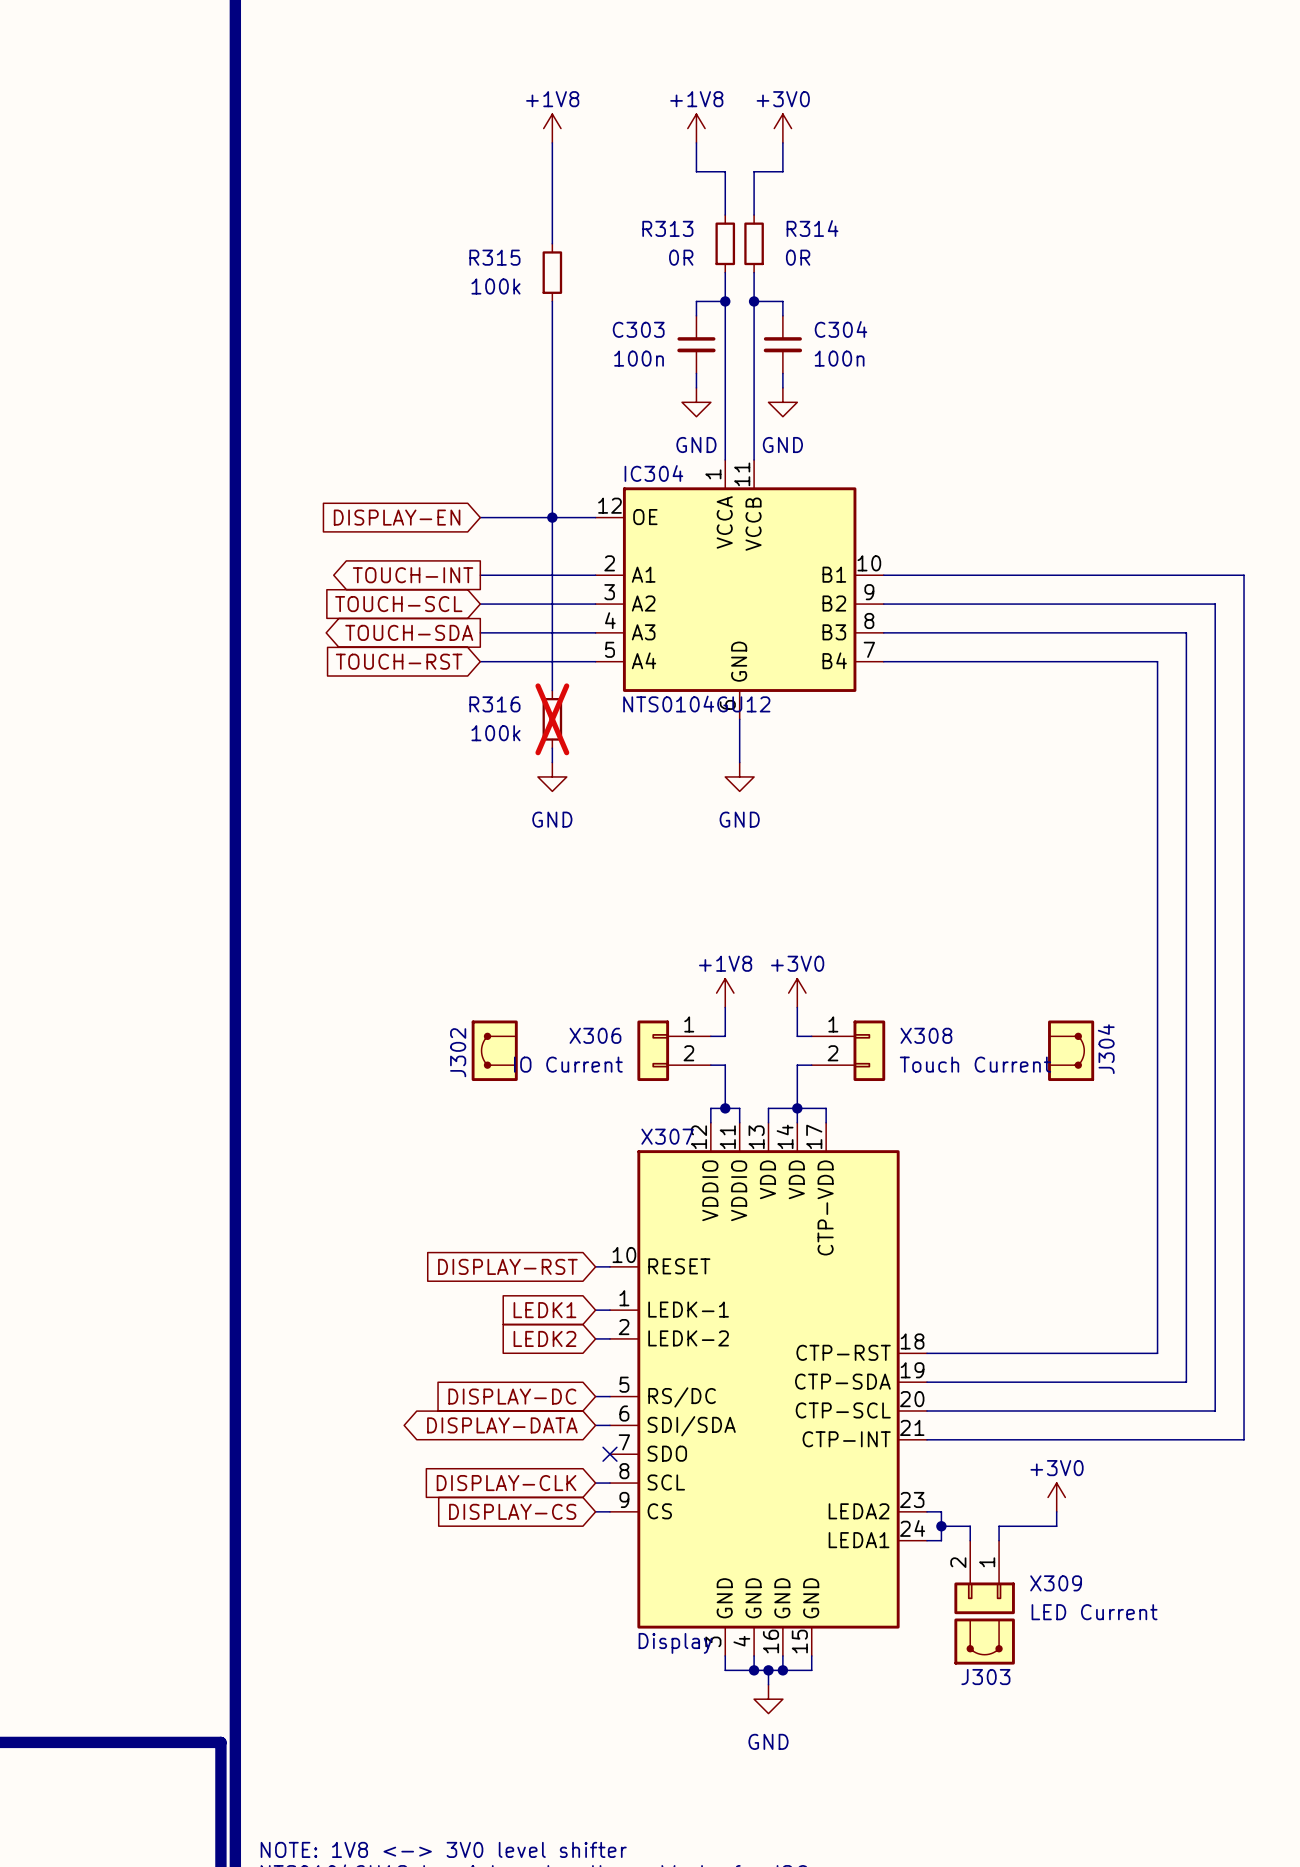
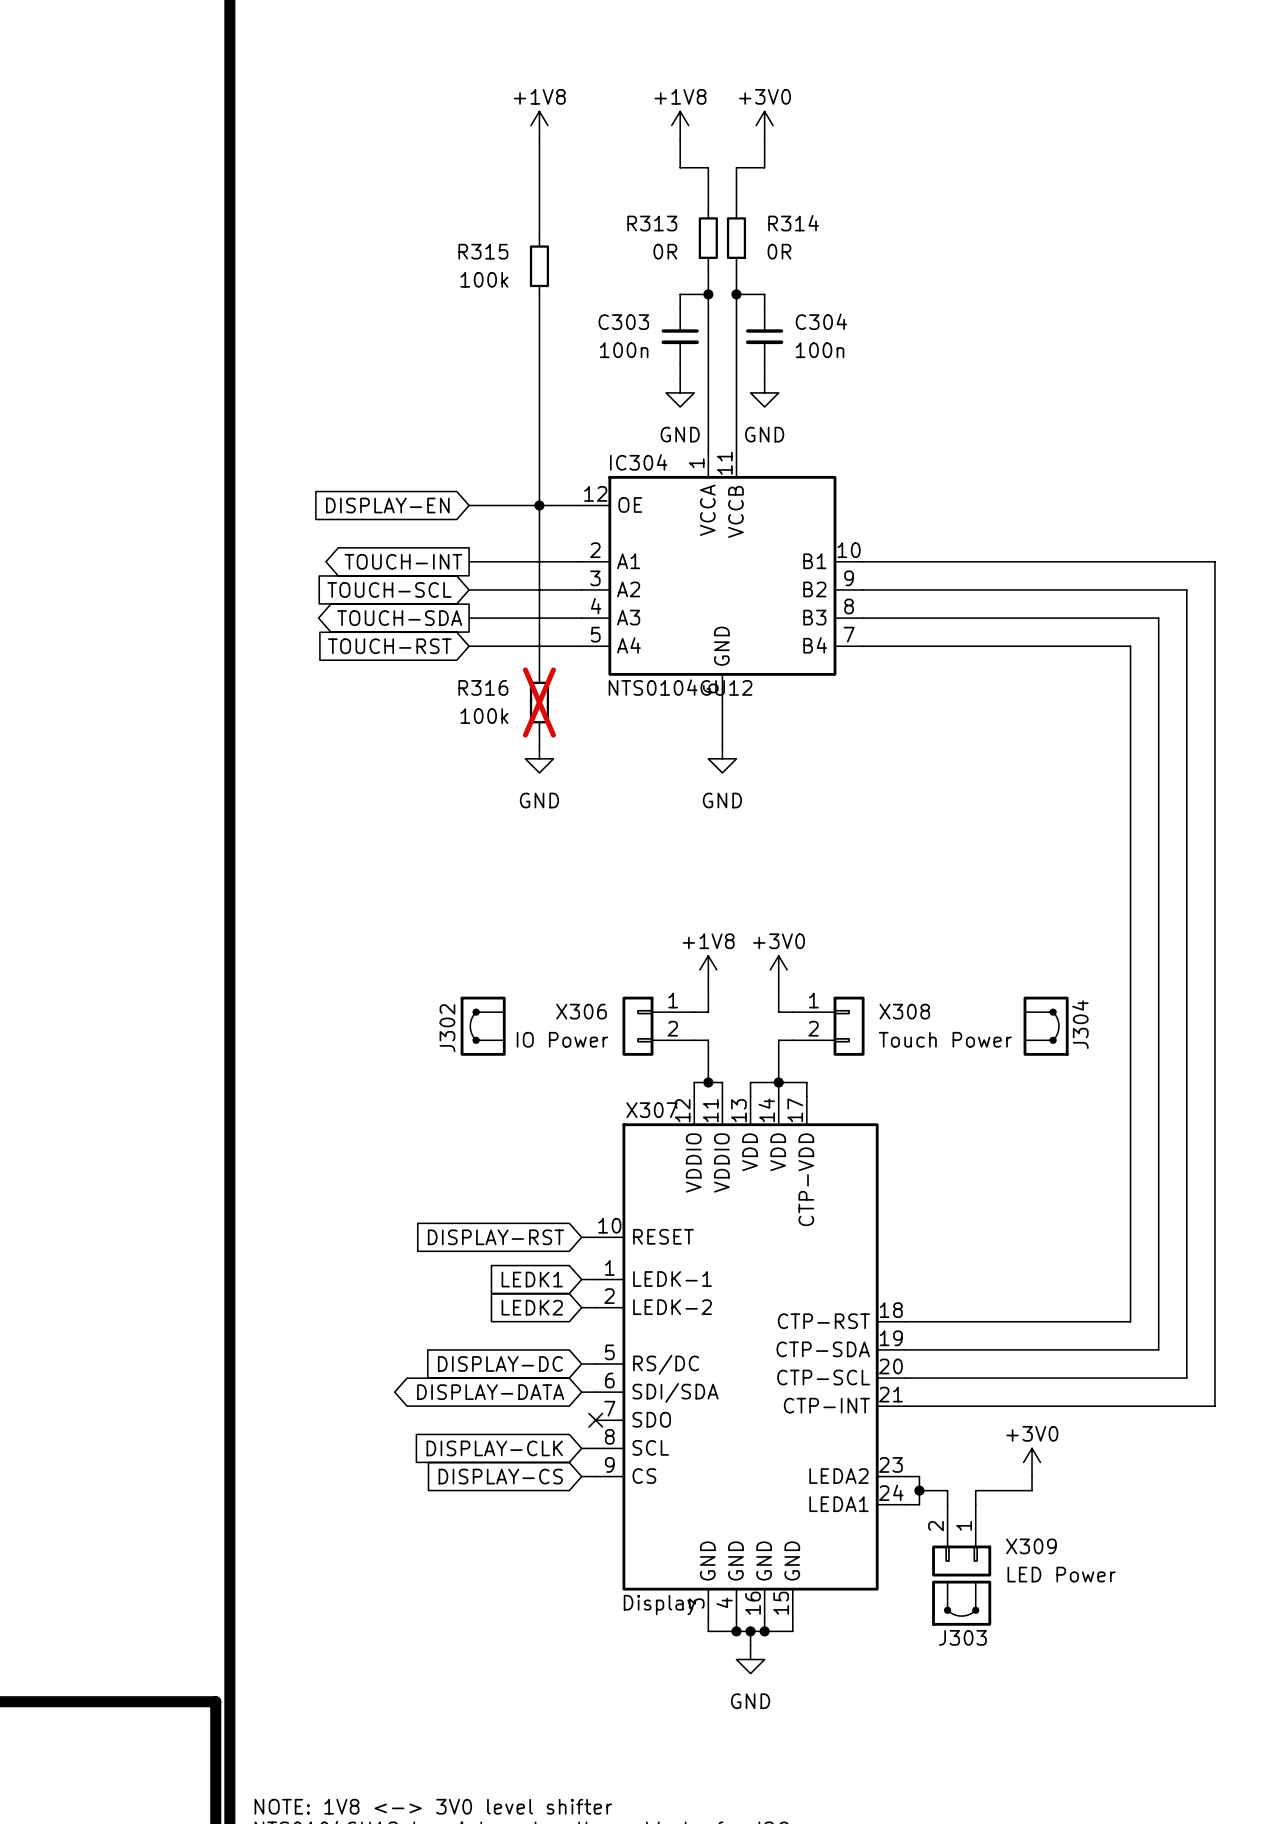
X306 value: IO Current (568, 1064) -> IO Power (562, 1039)
X308 value: Touch Current (975, 1064) -> Touch Power (945, 1039)
X309 value: LED Current (1094, 1612) -> LED Power (1061, 1574)

